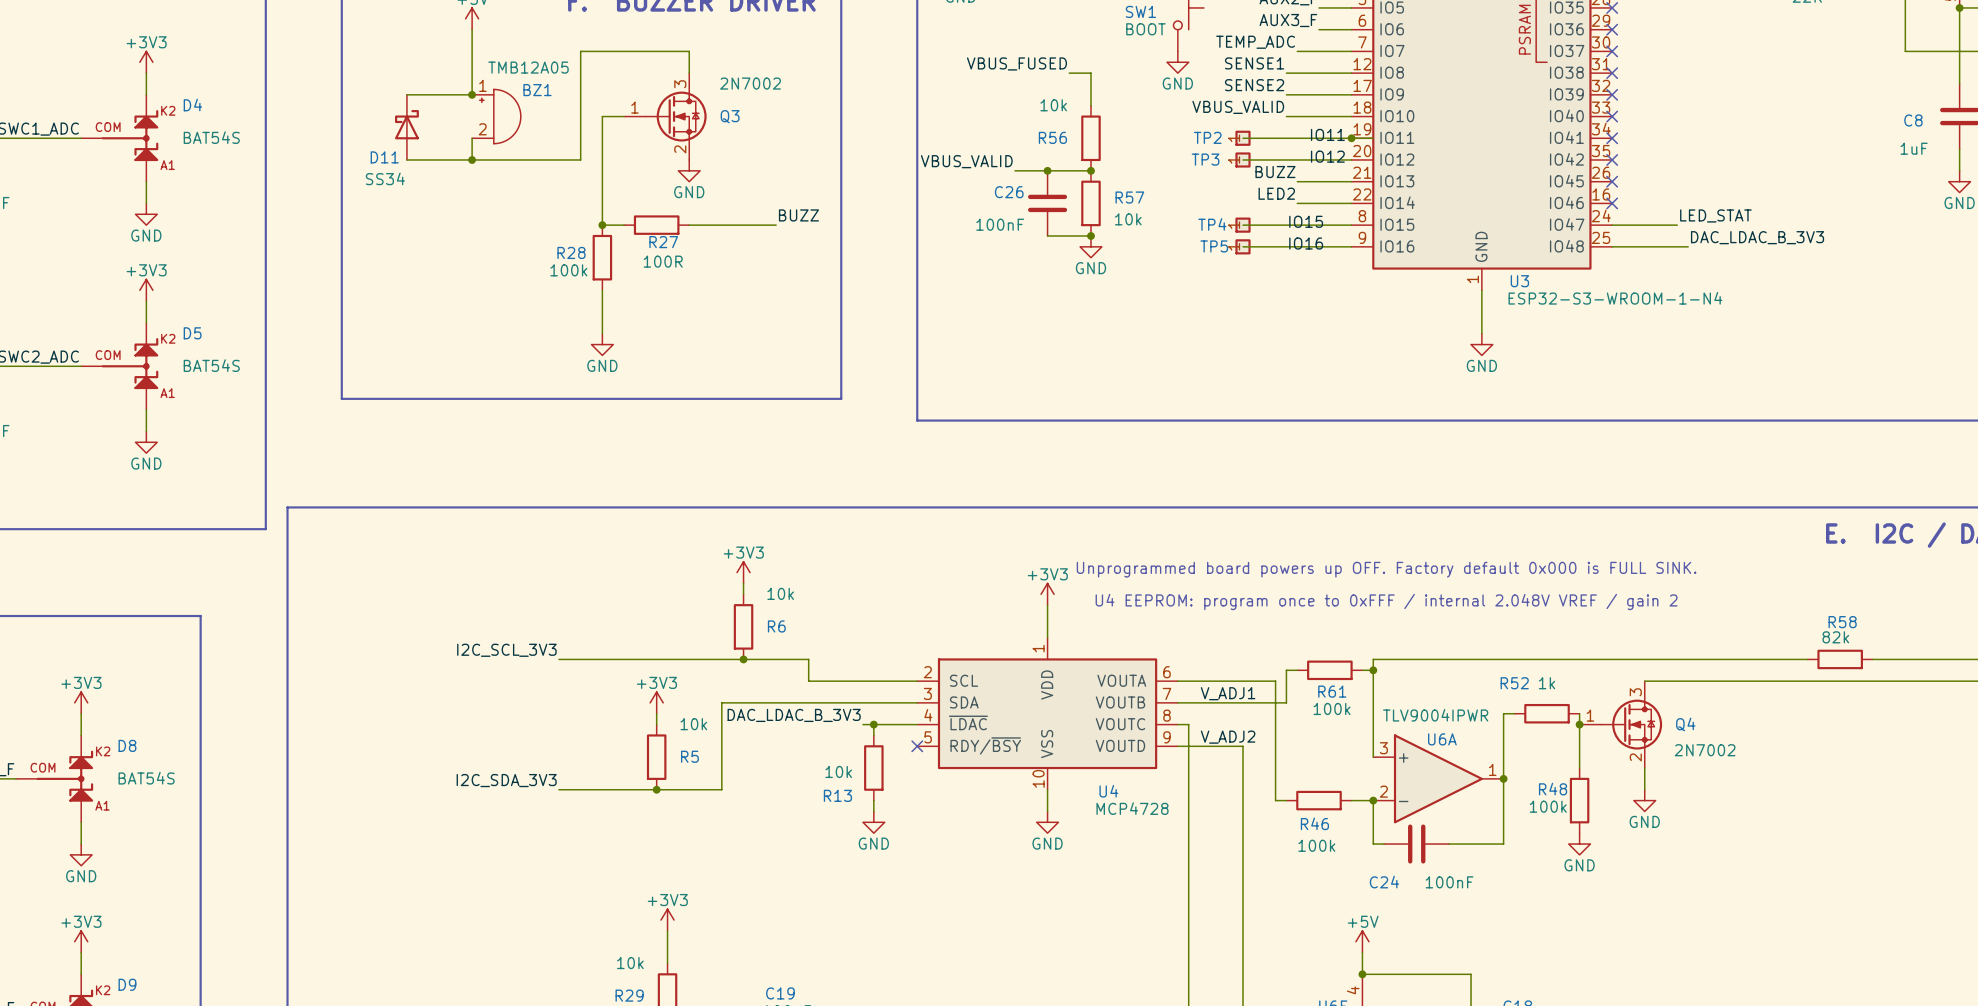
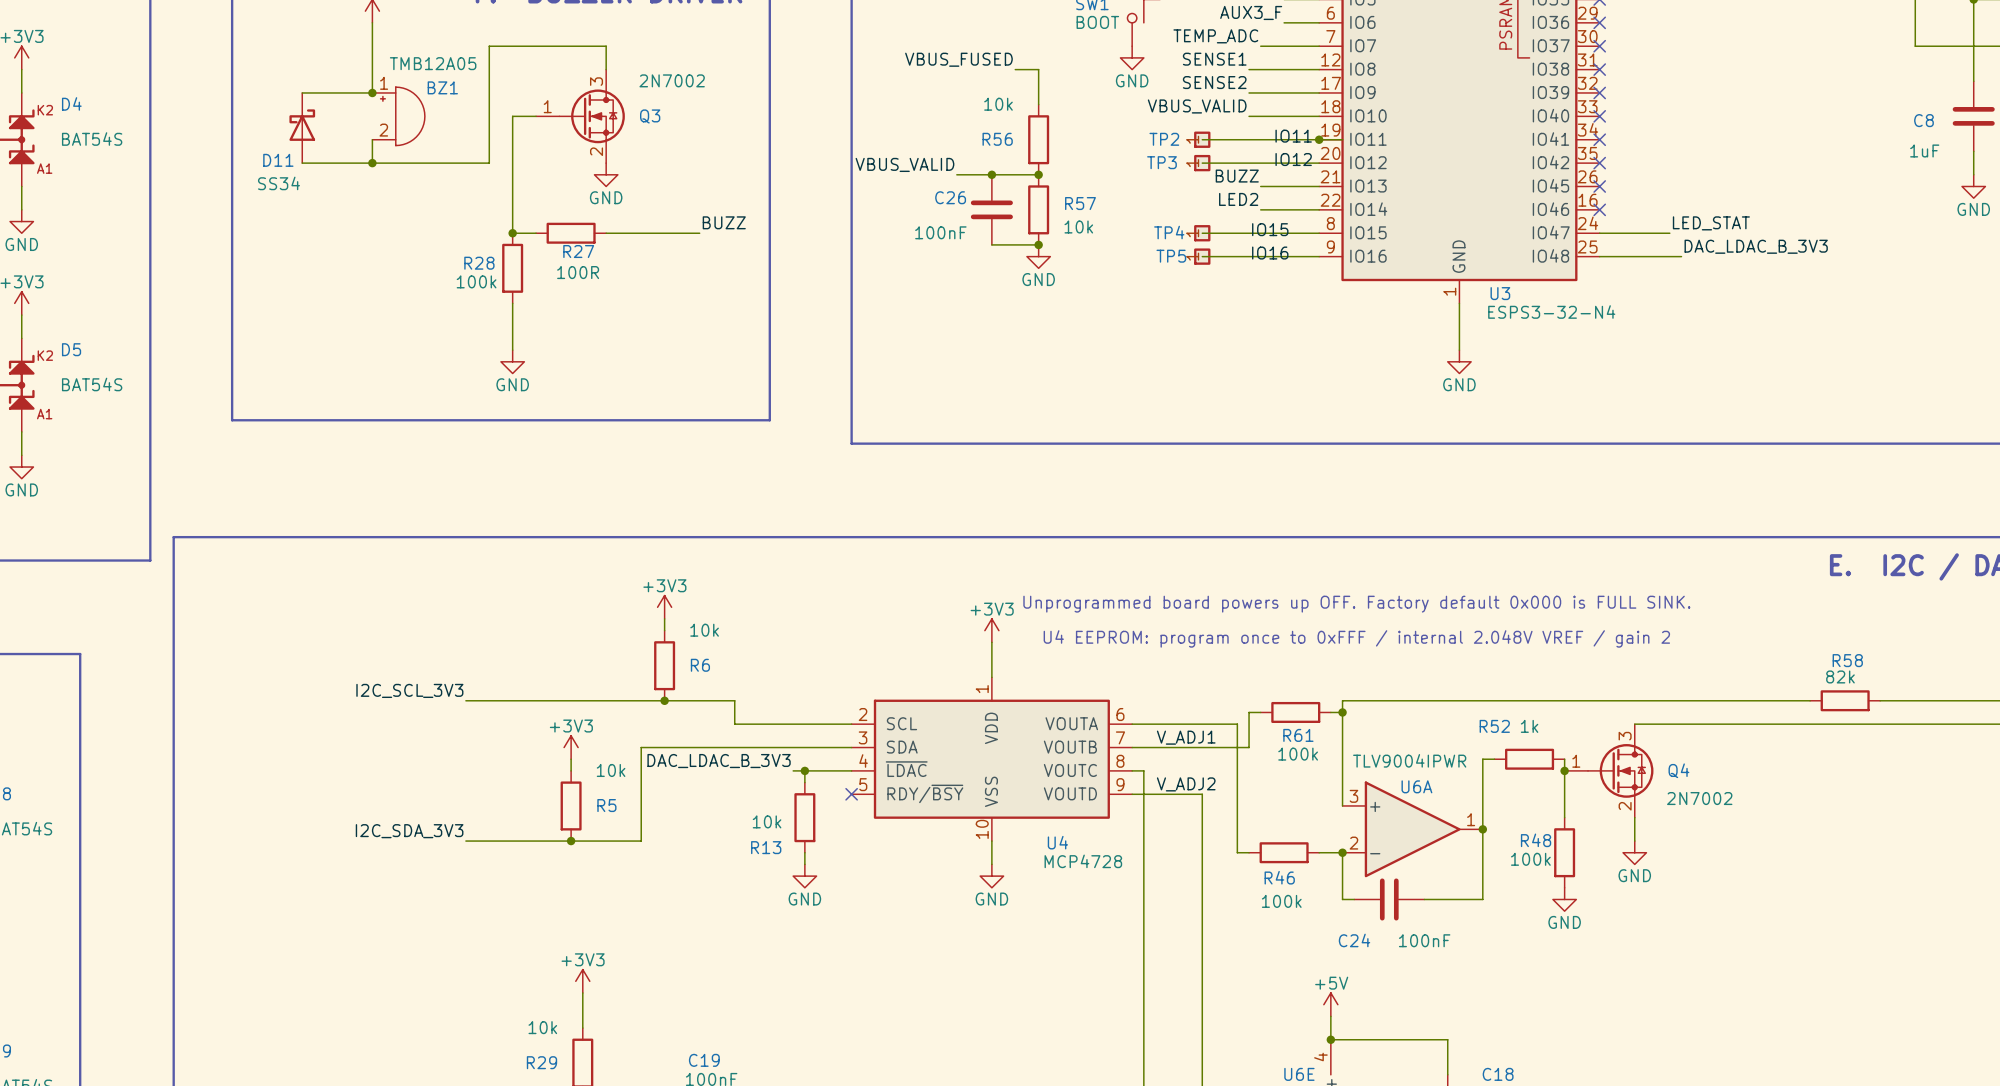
U3 value: ESP32-S3-WROOM-1-N4 (1615, 298) -> ESPS3-32-N4 (1551, 312)

